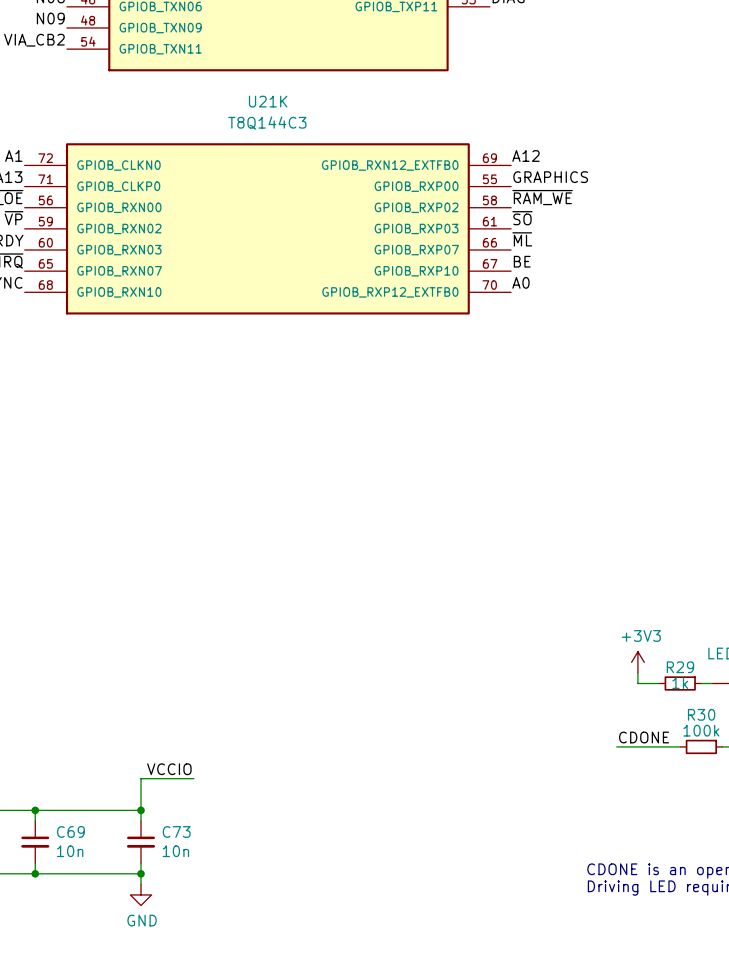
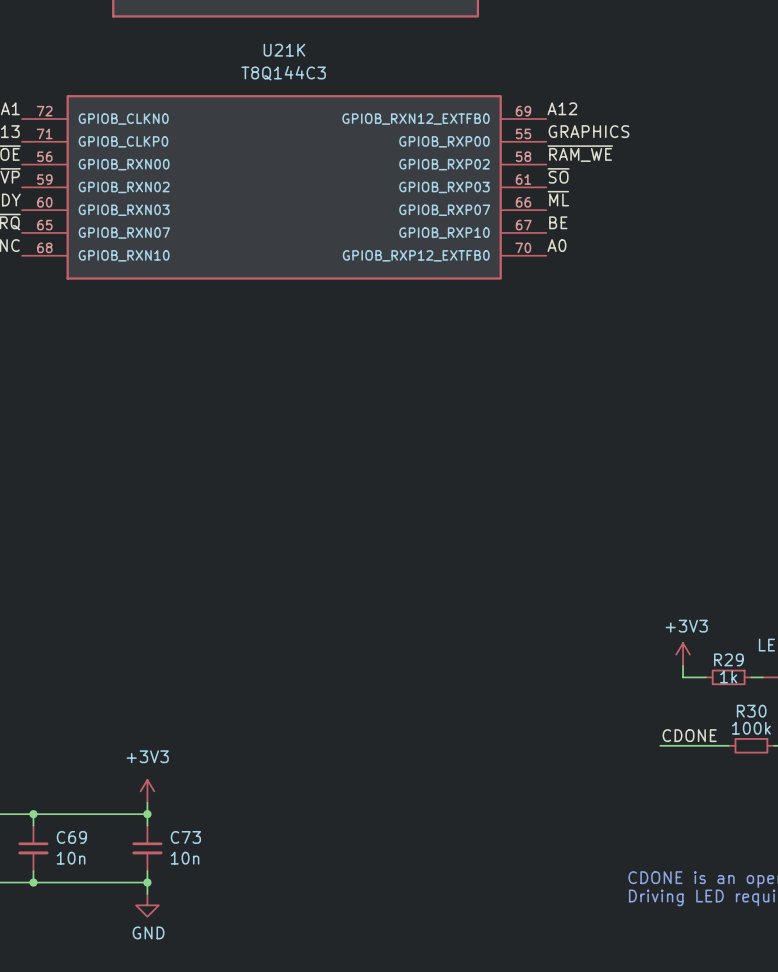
label: VCCIO (169, 769) -> none
wire: (193, 778) (141, 778) (141, 799) -> none
power symbol: none -> +3V3 (147, 791)

